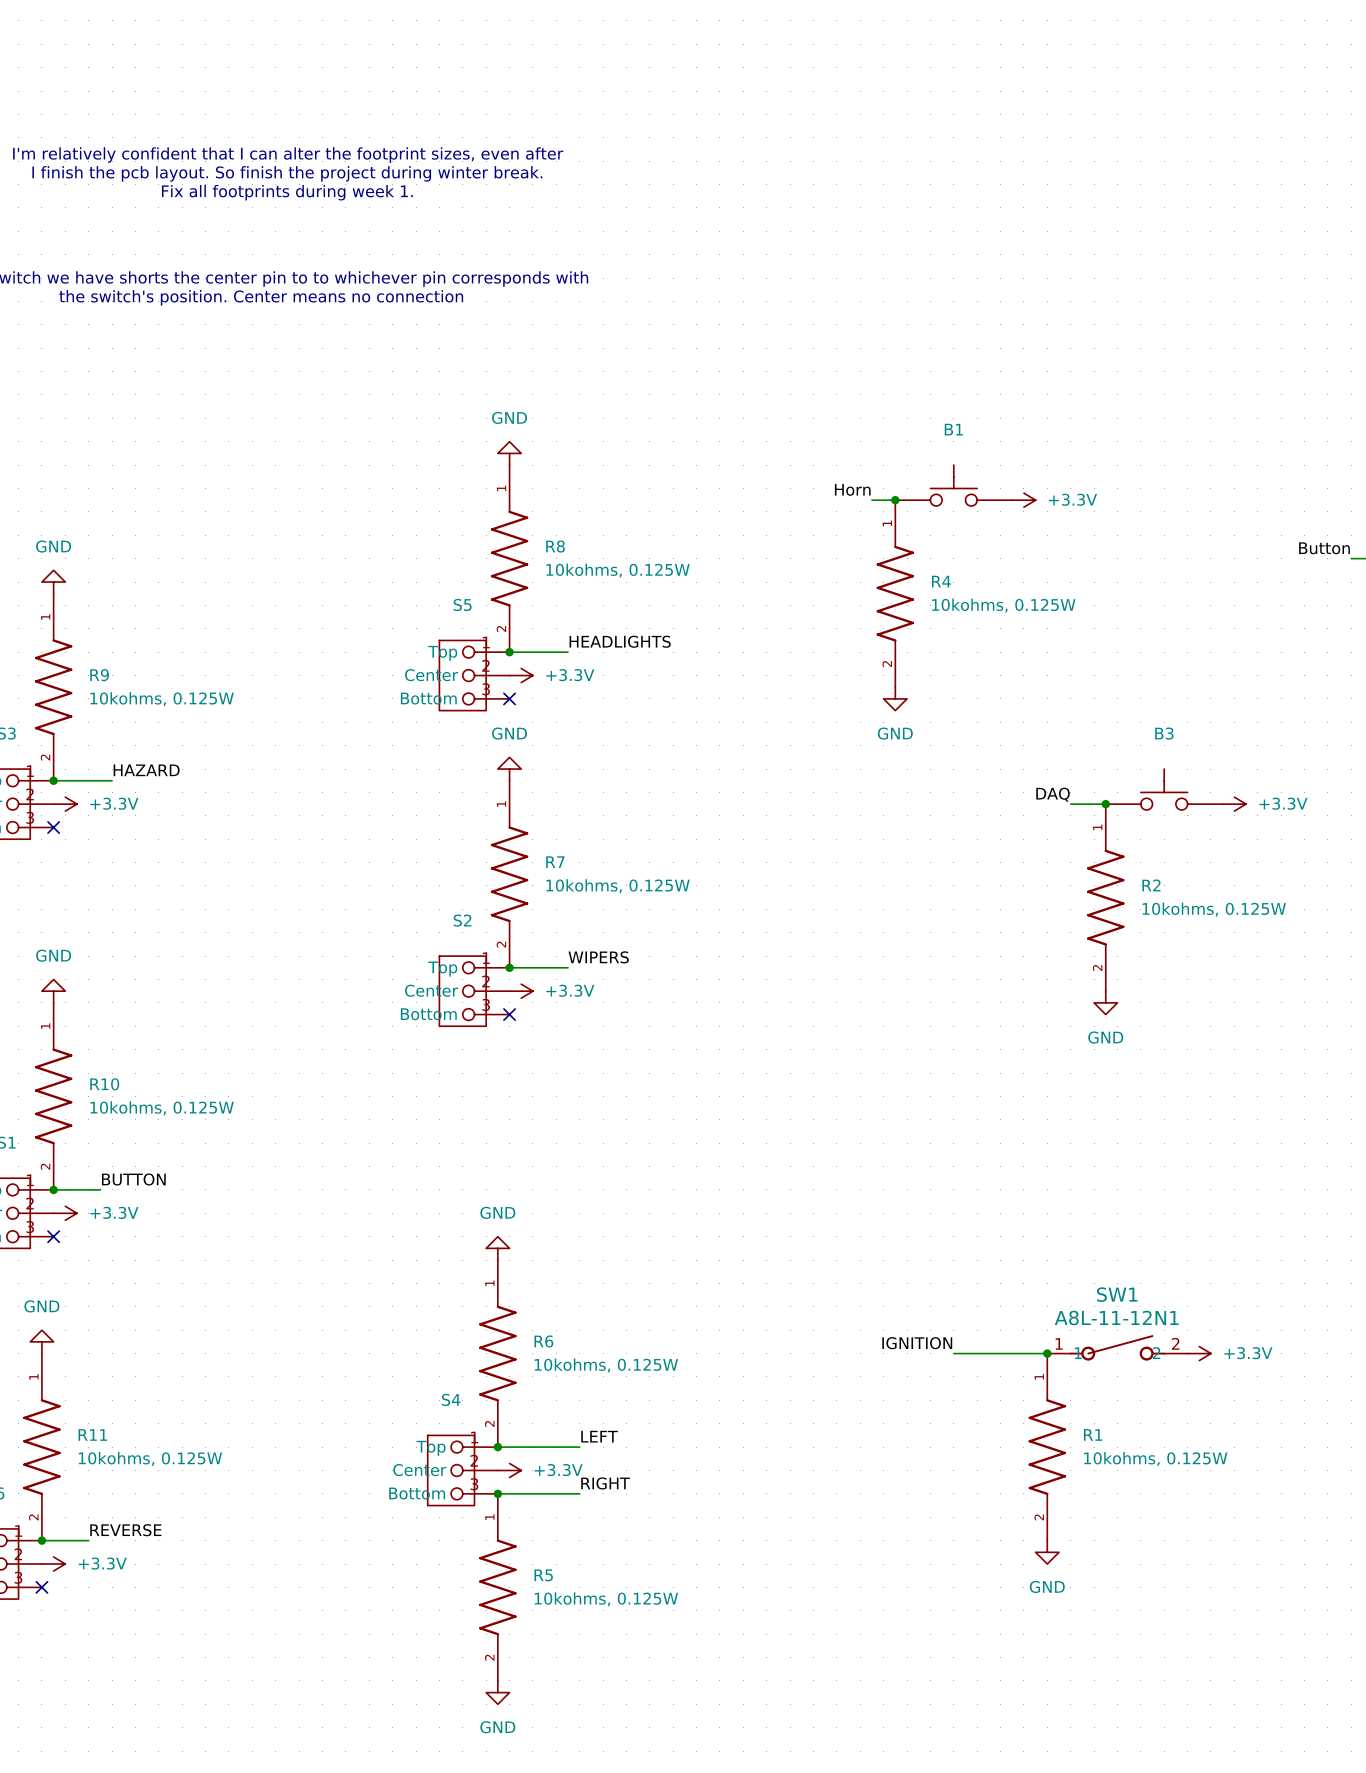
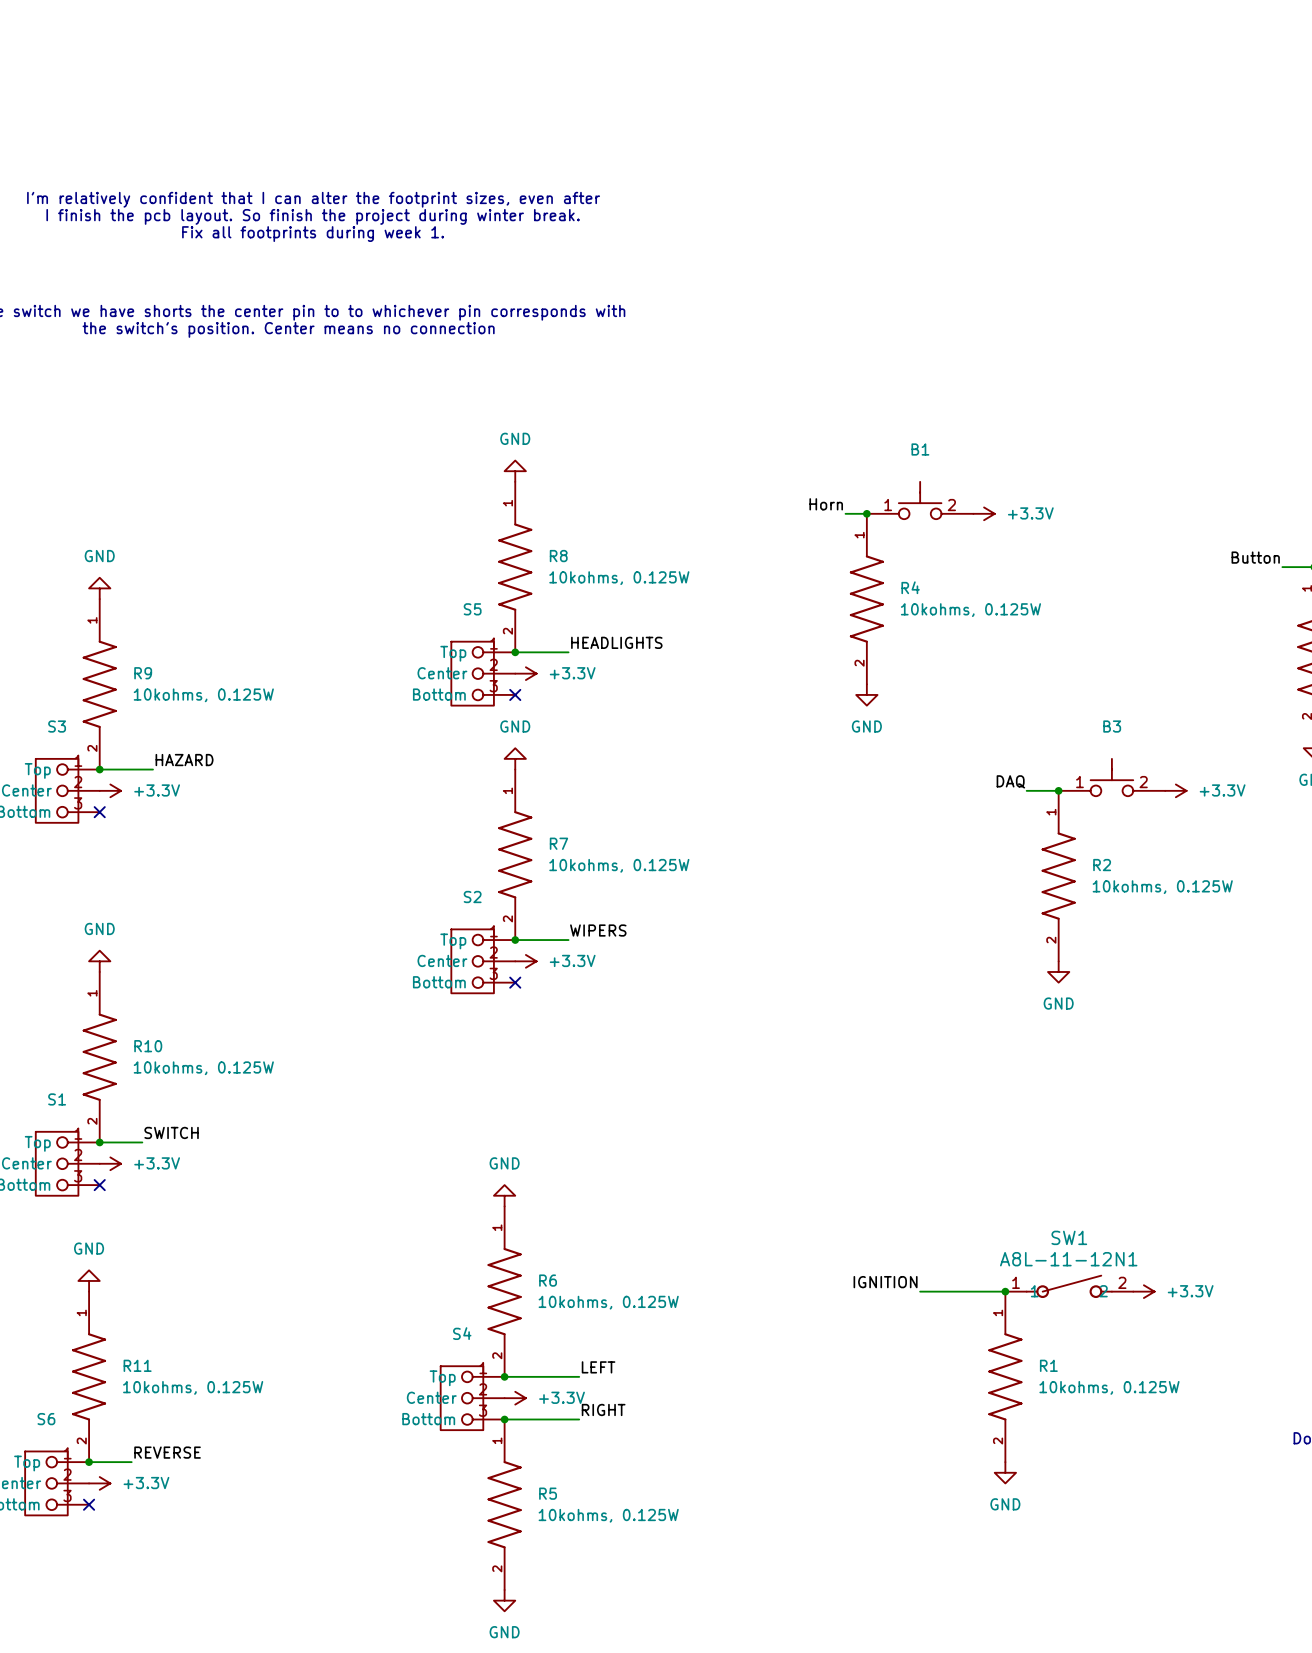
B1 pin number: none -> 1 (888, 505)
B1 pin number: none -> 2 (951, 505)
B3 pin number: none -> 1 (1079, 782)
B3 pin number: none -> 2 (1143, 782)
label: BUTTON (133, 1179) -> SWITCH (171, 1132)

